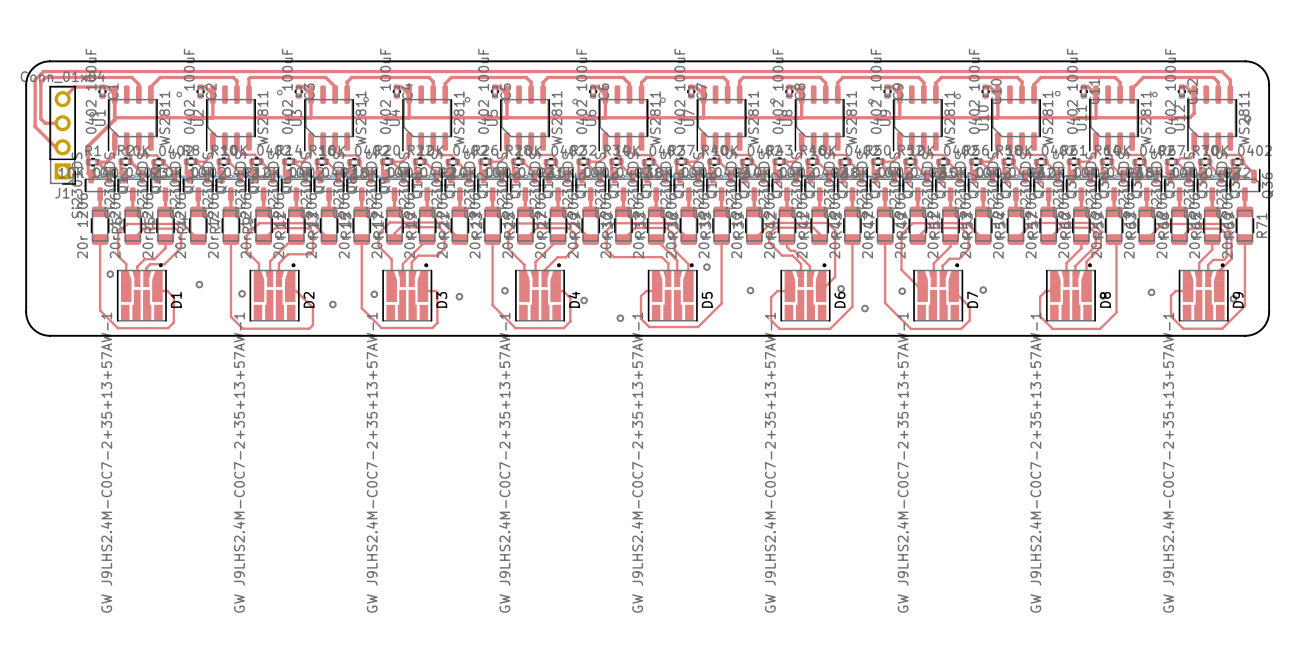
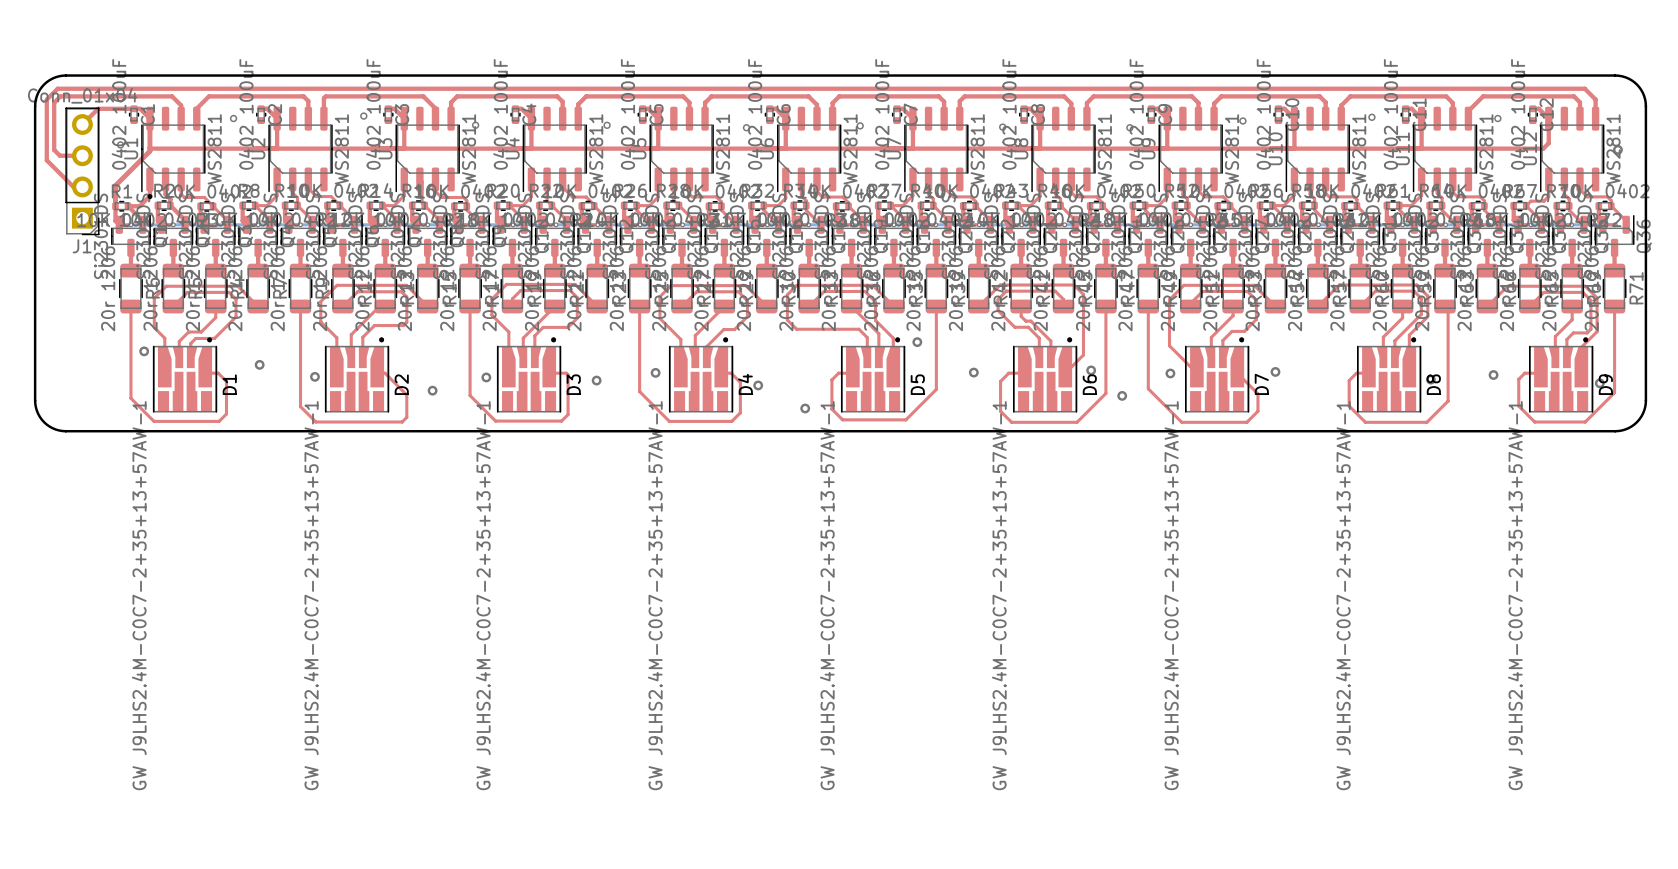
drawing: none -> [147, 194, 153, 200]

